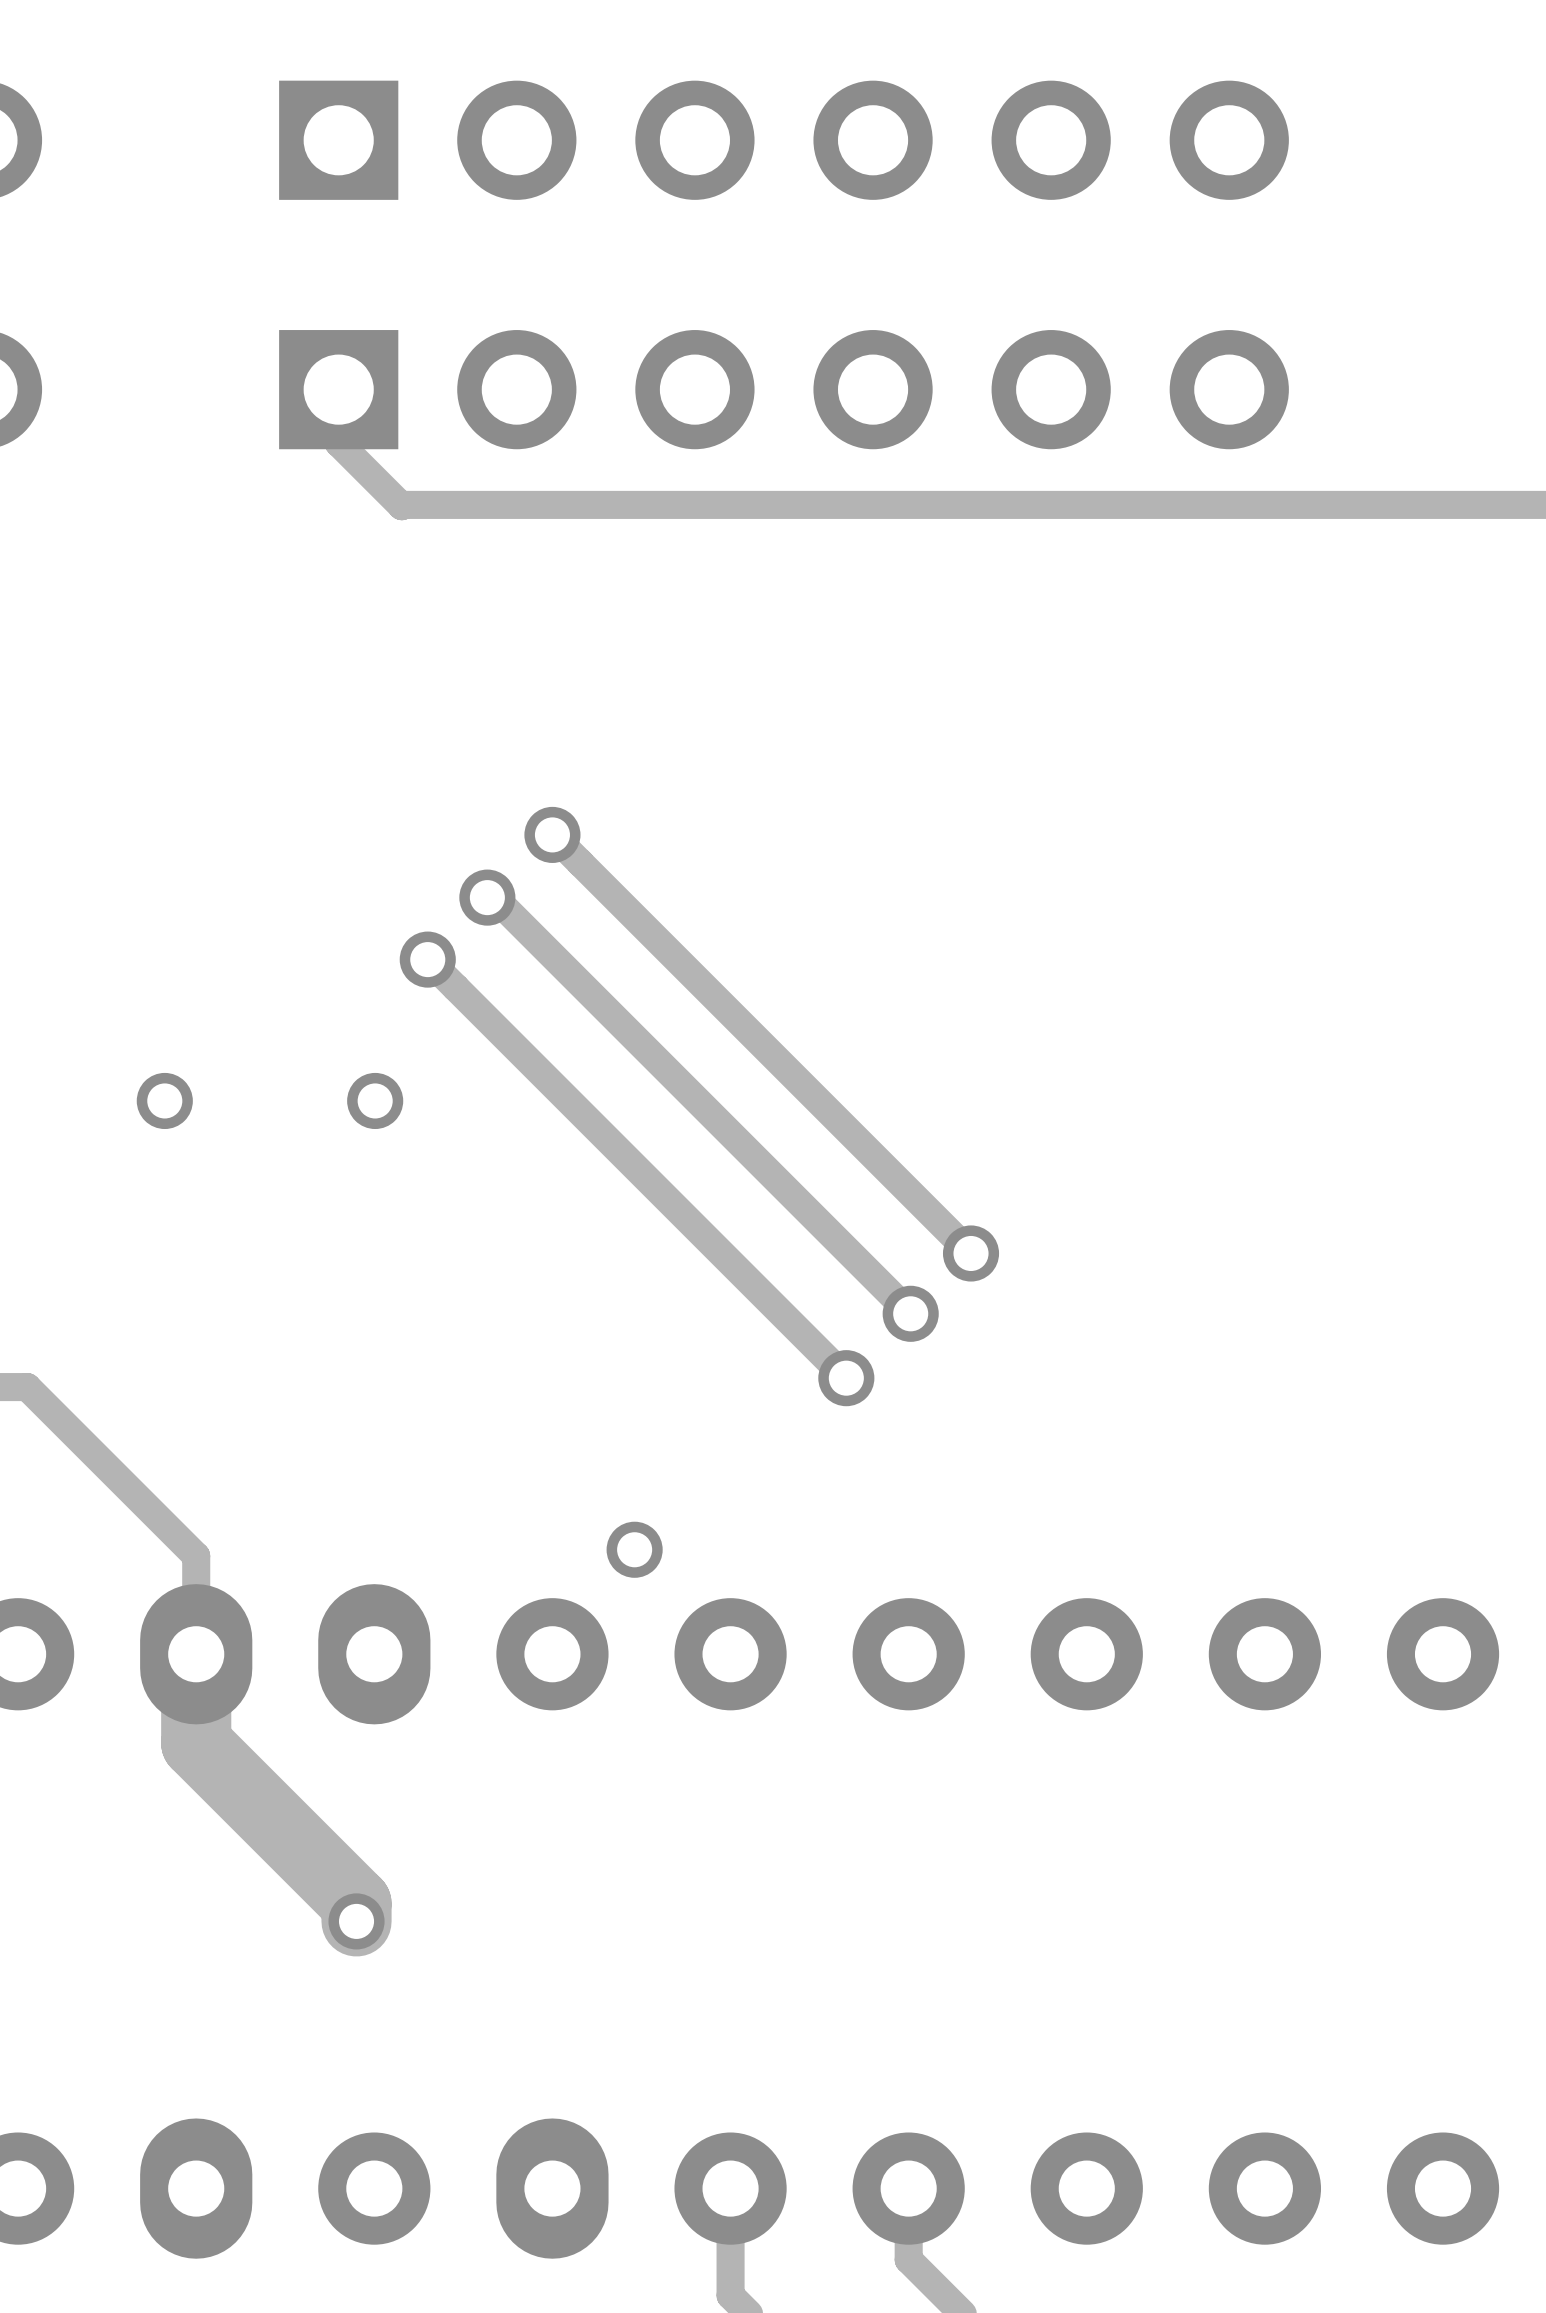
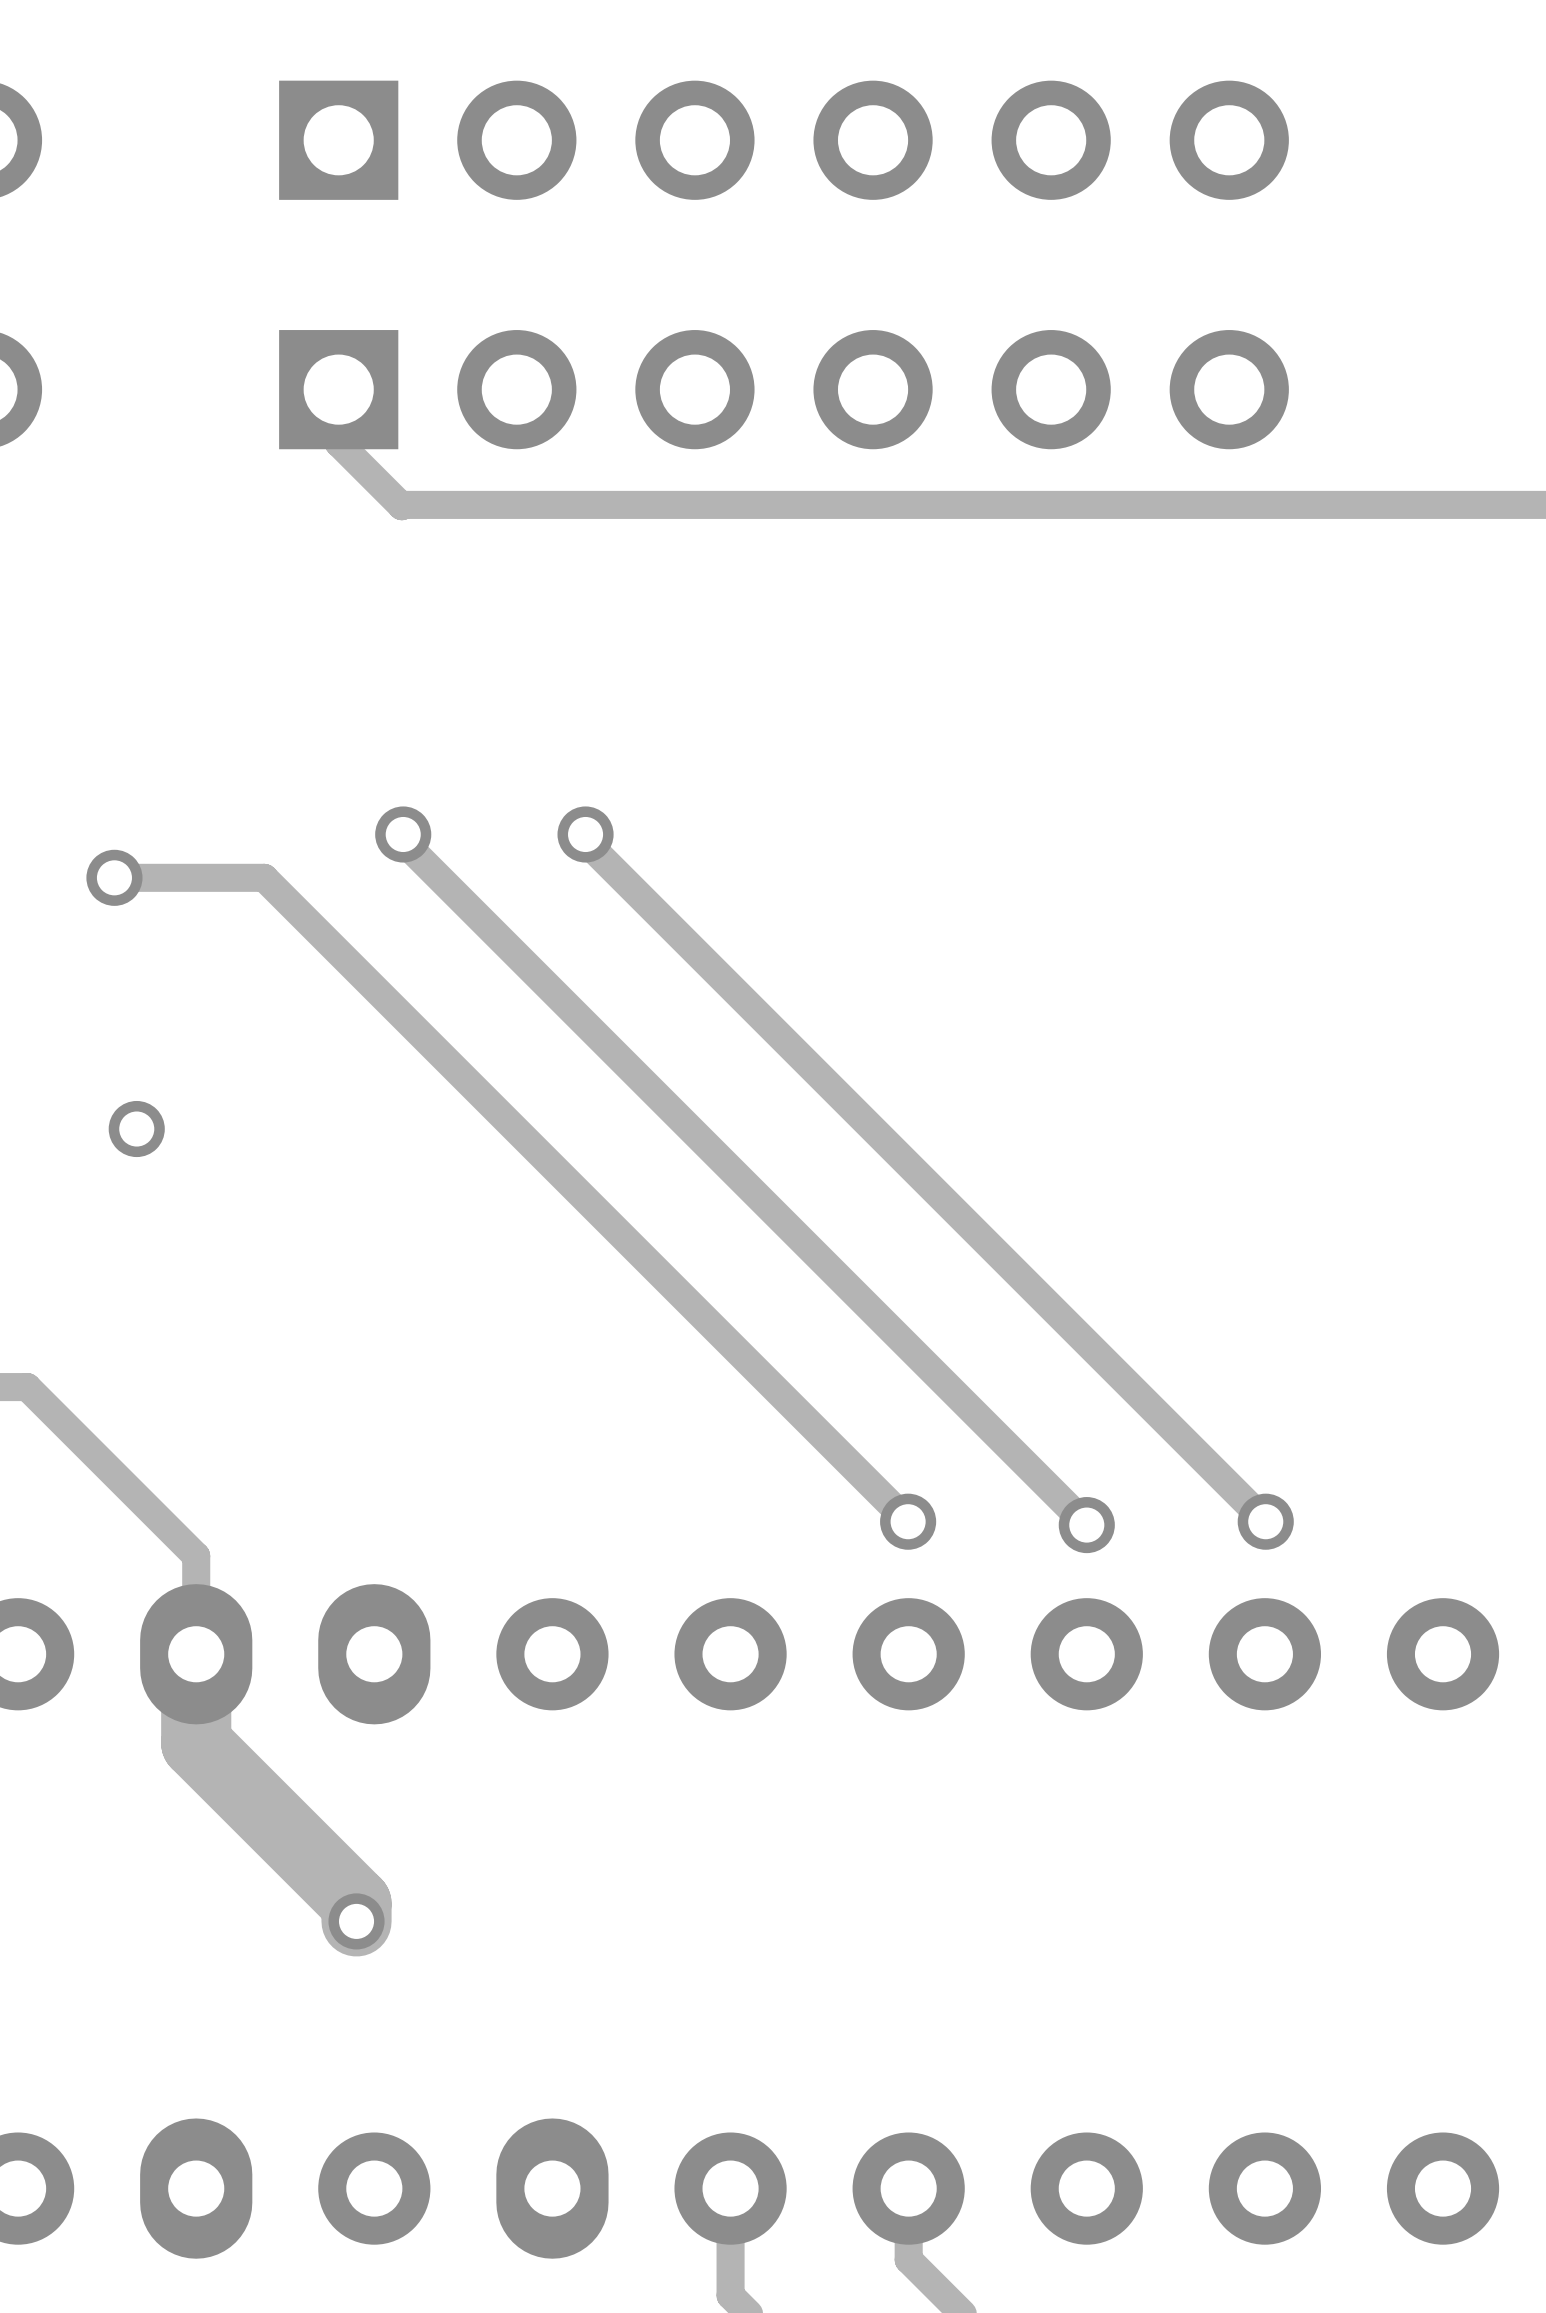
track: none -> (403, 834) (403, 841) (1086, 1525)
via: none -> (403, 834)
track: (552, 834) (971, 1253) -> none
via position: (552, 834) -> (585, 834)
track: none -> (585, 834) (585, 841) (1265, 1521)
track: none -> (114, 877) (264, 877) (908, 1521)
via: none -> (114, 877)
track: (487, 897) (494, 897) (910, 1313) -> none
via: (487, 897) -> none
track: (427, 959) (846, 1378) -> none
via: (427, 959) -> none
via position: (164, 1100) -> (136, 1129)
via: (375, 1100) -> none
via: (971, 1253) -> none
via: (910, 1313) -> none
via: (846, 1378) -> none
via: none -> (908, 1521)
via: none -> (1265, 1521)
via: none -> (1086, 1525)
via: (634, 1549) -> none

